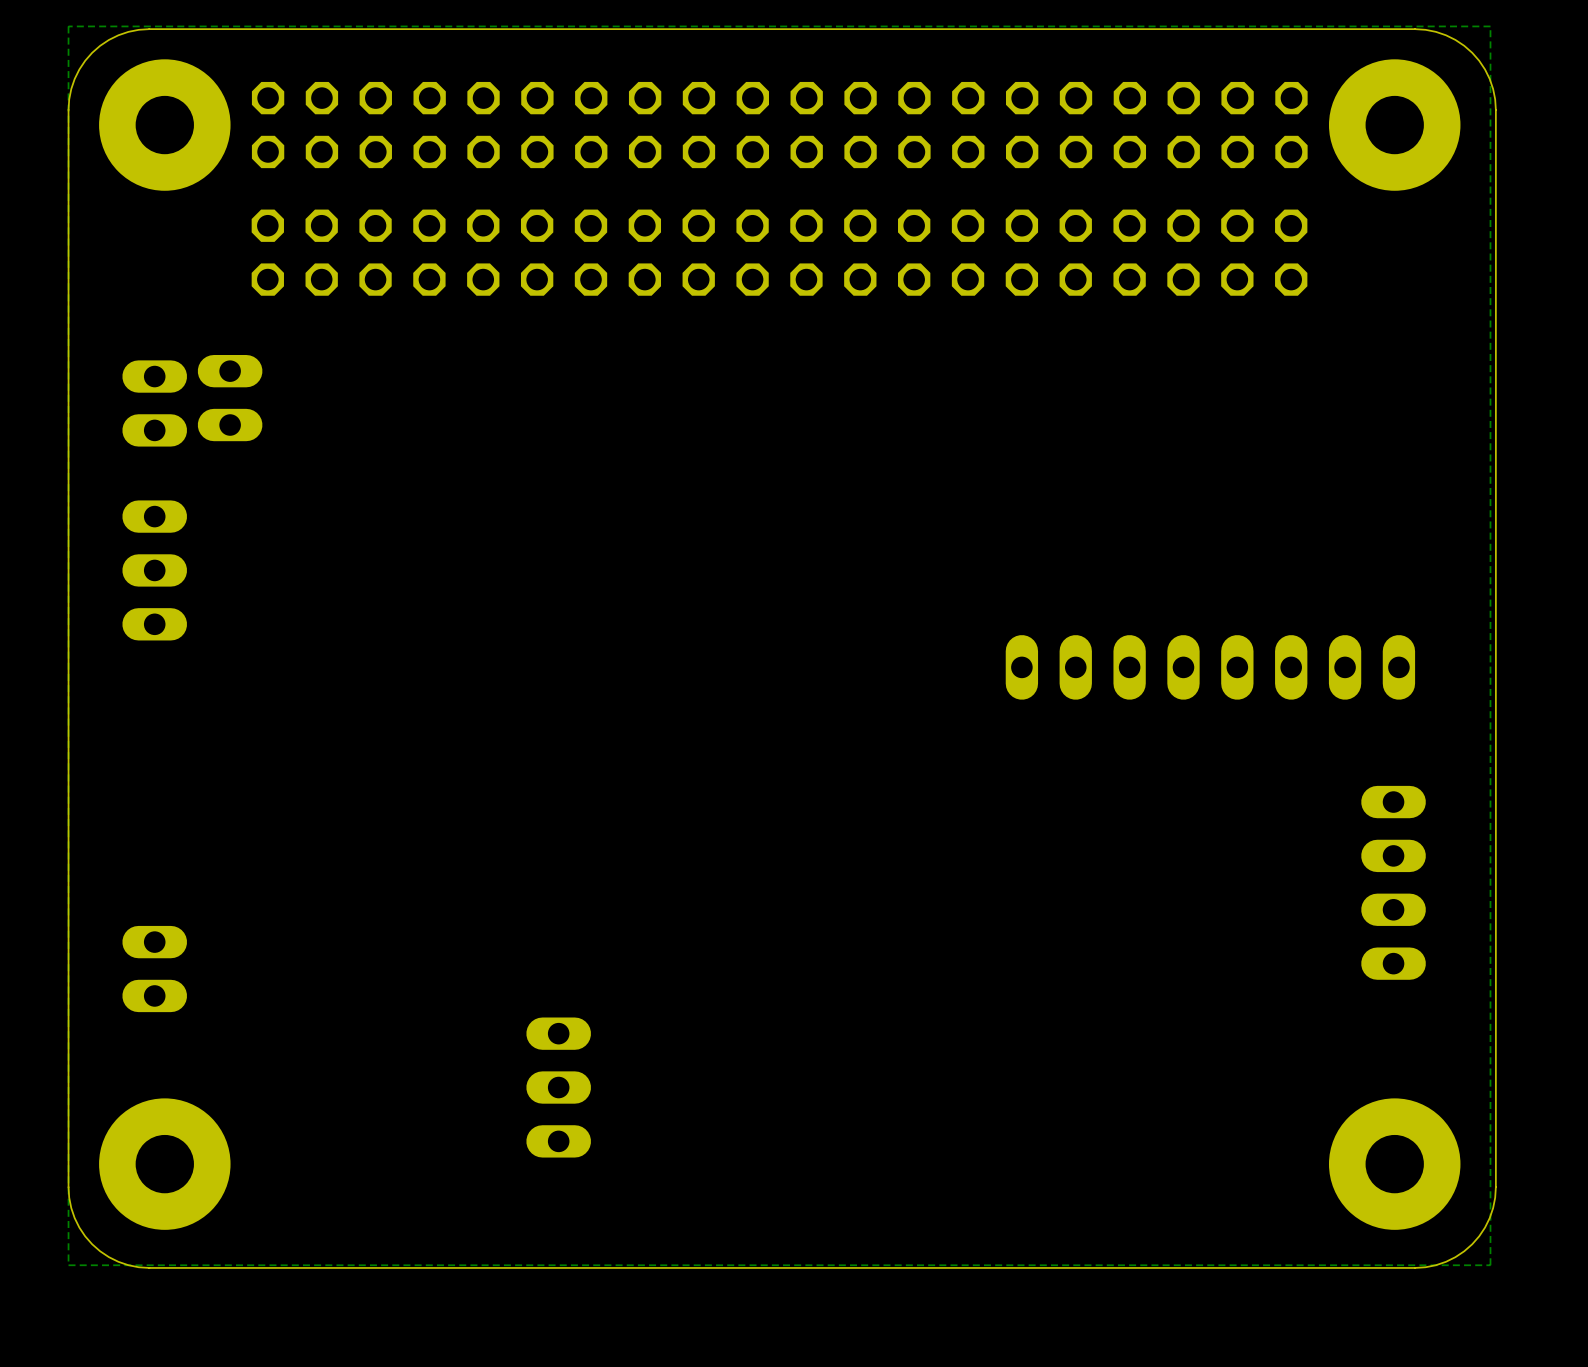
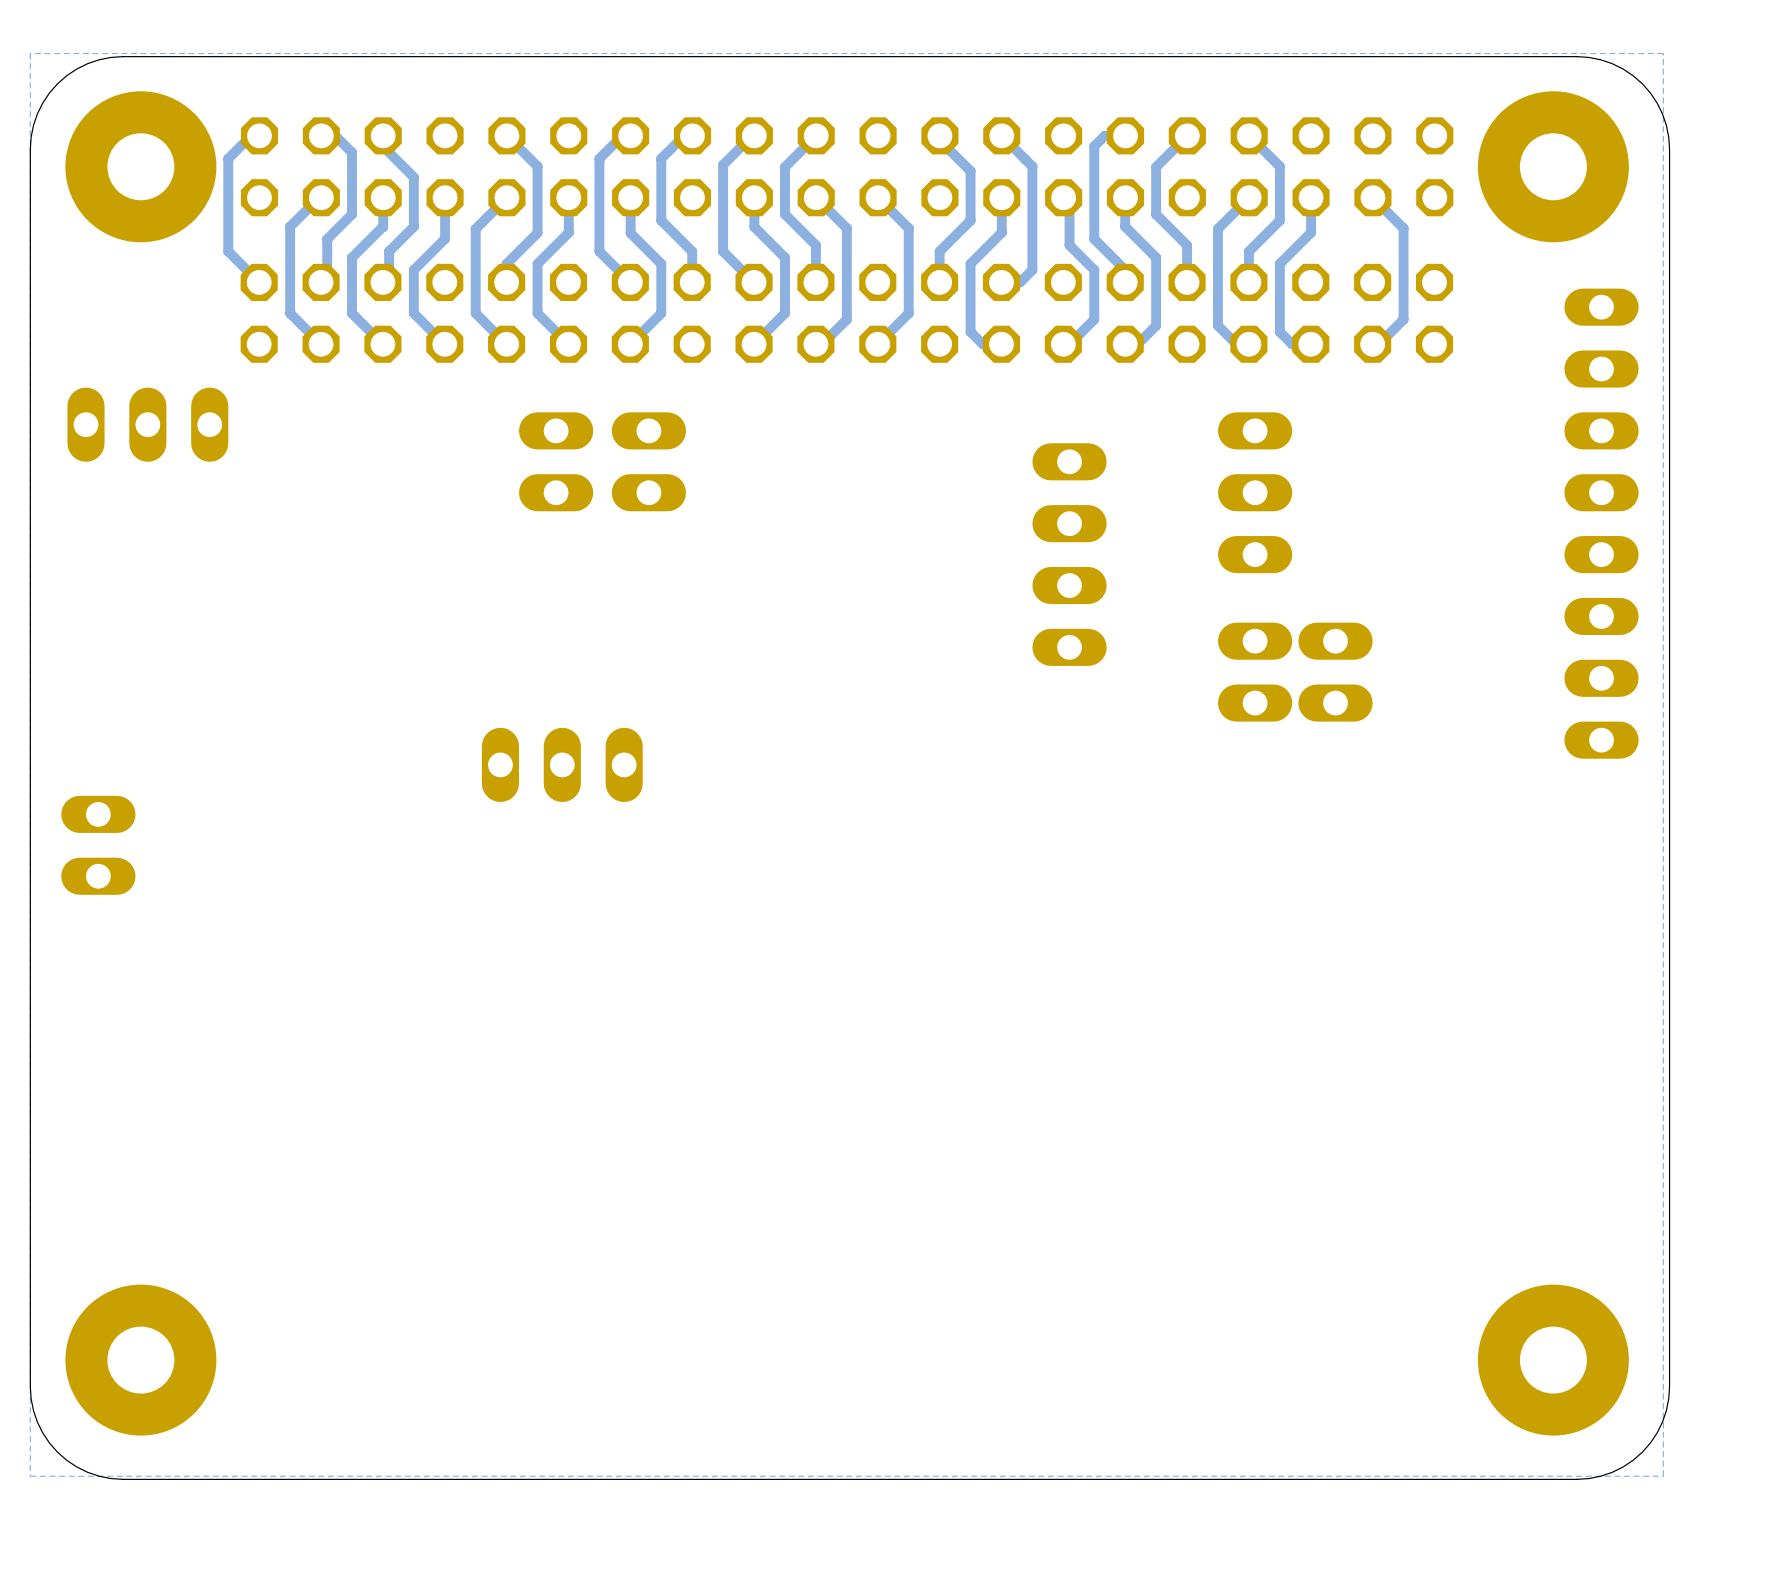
track: none -> (259, 135) (251, 135) (228, 158) (228, 251) (259, 282)
track: none -> (321, 135) (335, 135) (351, 152) (351, 214) (327, 239) (327, 276) (321, 282)
track: none -> (383, 135) (383, 146) (413, 177) (413, 226) (389, 251) (389, 276) (382, 282)
track: none -> (506, 135) (537, 166) (537, 232) (506, 263) (506, 282)
track: none -> (630, 135) (622, 135) (599, 158) (599, 251) (630, 282)
track: none -> (692, 135) (684, 135) (661, 158) (661, 220) (692, 251) (692, 282)
track: none -> (754, 135) (723, 164) (723, 251) (754, 282)
track: none -> (816, 135) (784, 167) (784, 214) (815, 245) (815, 282)
track: none -> (939, 135) (939, 140) (970, 171) (970, 220) (939, 251) (939, 282)
track: none -> (1001, 135) (1032, 166) (1032, 270) (1020, 282) (1001, 282)
track: none -> (1125, 135) (1104, 135) (1094, 146) (1094, 239) (1125, 270) (1125, 282)
track: none -> (1187, 135) (1156, 167) (1156, 214) (1187, 245) (1187, 282)
track: none -> (1249, 135) (1279, 166) (1279, 220) (1248, 251) (1248, 282)
track: none -> (321, 197) (290, 226) (290, 313) (321, 344)
track: none -> (383, 197) (383, 227) (351, 257) (351, 313) (382, 344)
track: none -> (445, 197) (445, 238) (413, 270) (413, 313) (444, 344)
track: none -> (506, 197) (475, 228) (475, 313) (506, 344)
track: none -> (568, 197) (568, 232) (537, 263) (537, 313) (568, 344)
track: none -> (630, 197) (630, 233) (661, 263) (661, 313) (630, 344)
track: none -> (754, 197) (754, 227) (784, 257) (784, 313) (754, 344)
track: none -> (816, 197) (846, 228) (846, 319) (822, 344) (815, 344)
track: none -> (878, 197) (908, 228) (908, 313) (877, 344)
track: none -> (1001, 197) (1001, 232) (970, 263) (970, 331) (982, 344) (1001, 344)
track: none -> (1063, 197) (1069, 203) (1069, 245) (1094, 270) (1094, 319) (1069, 344) (1063, 344)
track: none -> (1249, 197) (1218, 228) (1218, 325) (1236, 344) (1248, 344)
track: none -> (1311, 197) (1311, 232) (1279, 263) (1279, 331) (1292, 344) (1310, 344)
track: none -> (1372, 197) (1403, 228) (1403, 319) (1378, 344) (1372, 344)
track: none -> (1125, 198) (1125, 226) (1156, 257) (1156, 325) (1137, 344) (1125, 344)
part: none -> (147, 424)
part: none -> (556, 461)
part: none -> (648, 461)
part: (230, 398) -> none
part: (154, 403) -> none
part: none -> (1255, 492)
part: none -> (1069, 554)
part: none -> (1255, 672)
part: none -> (1335, 672)
part: (154, 570) -> none
part: none -> (562, 764)
part rotation: 0° (1210, 667) -> 90° clockwise (1601, 523)
part position: (1210, 667) -> (1601, 523)
part: none -> (98, 845)
part: (1393, 882) -> none
part: (154, 969) -> none
part: (558, 1087) -> none

